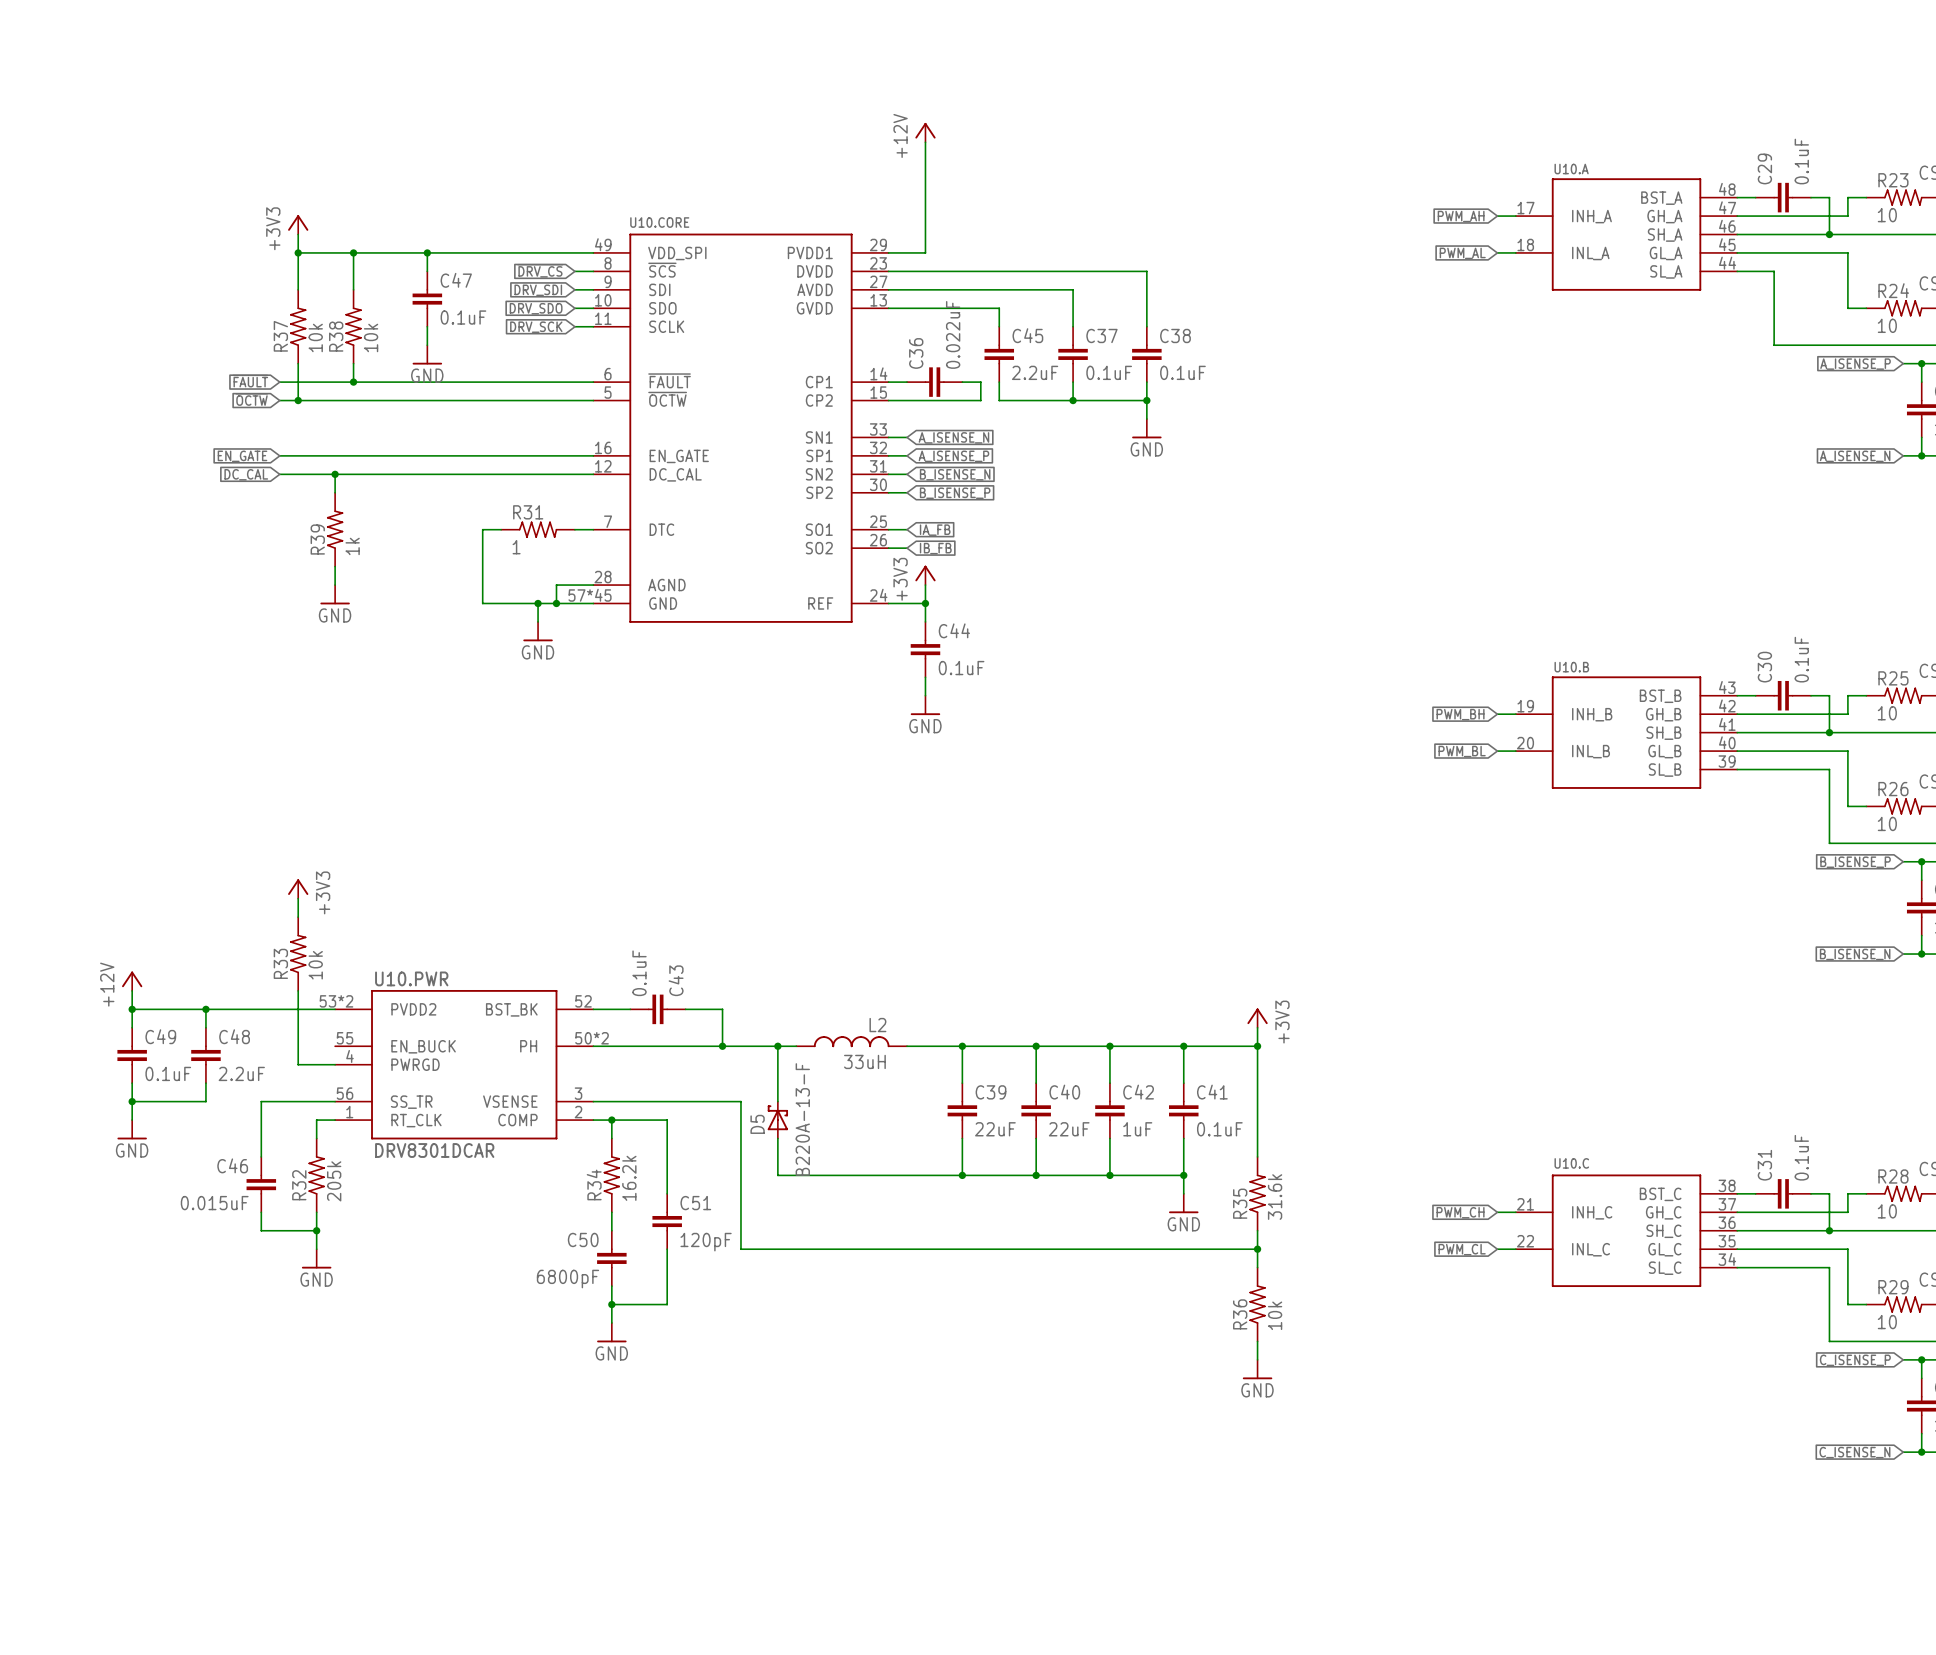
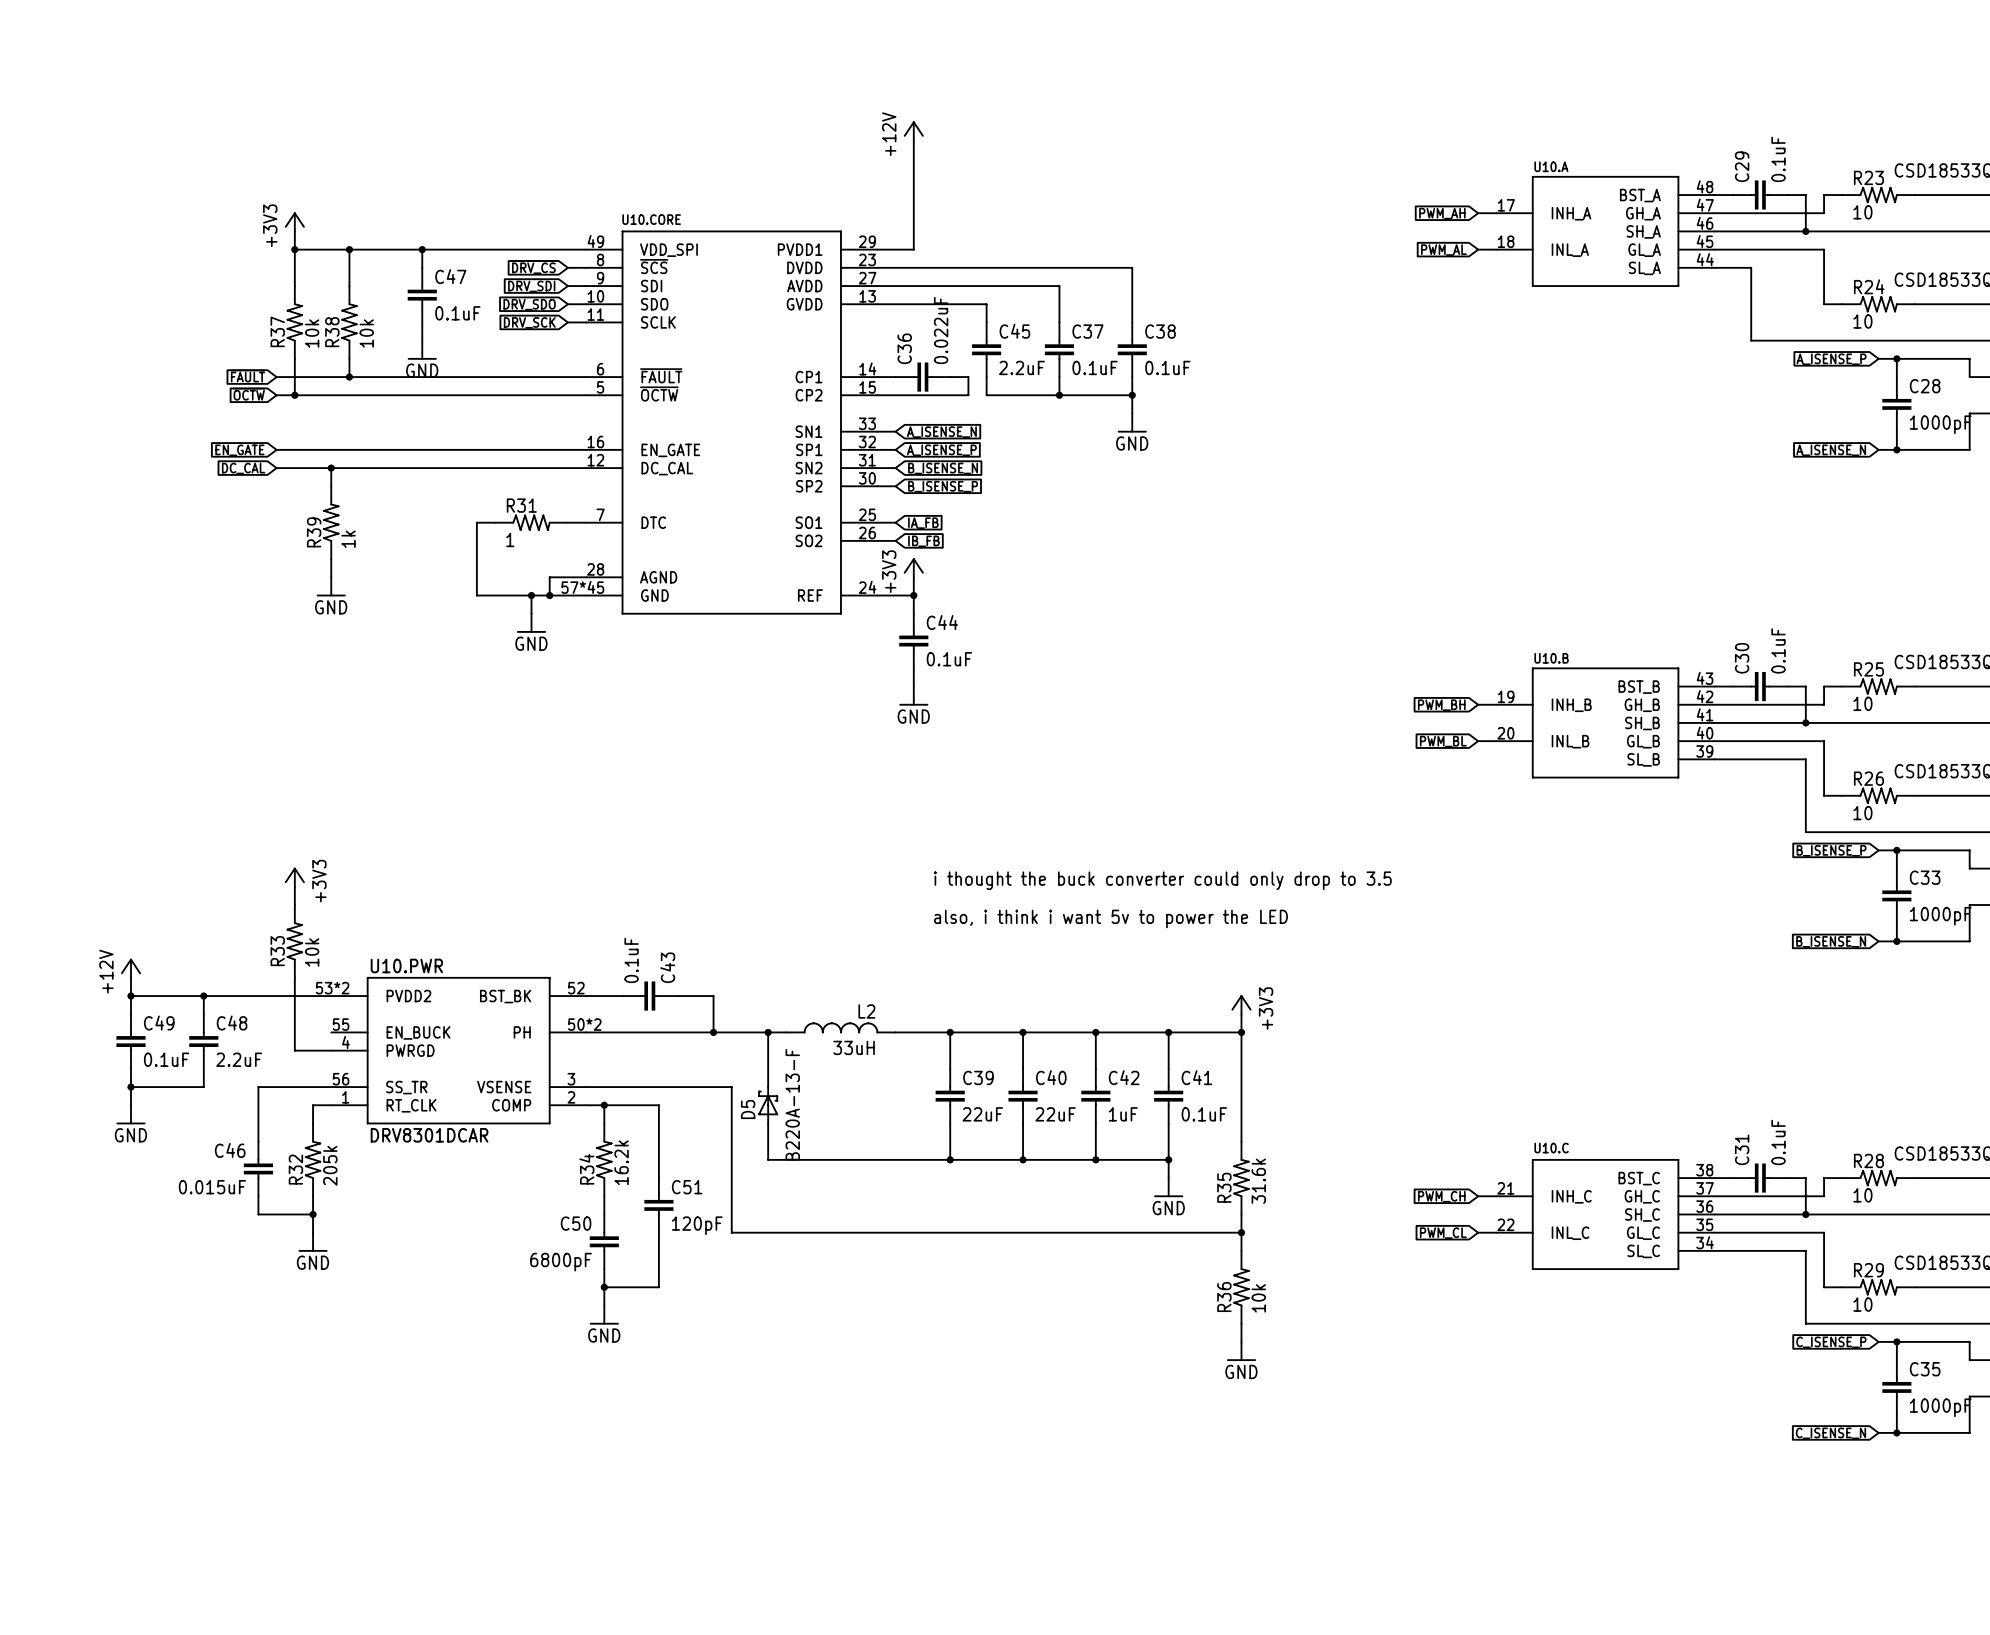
text: none -> i thought the buck converter could only drop to 3.5 (1162, 880)
text: none -> also, i think i want 5v to power the LED (1110, 918)

